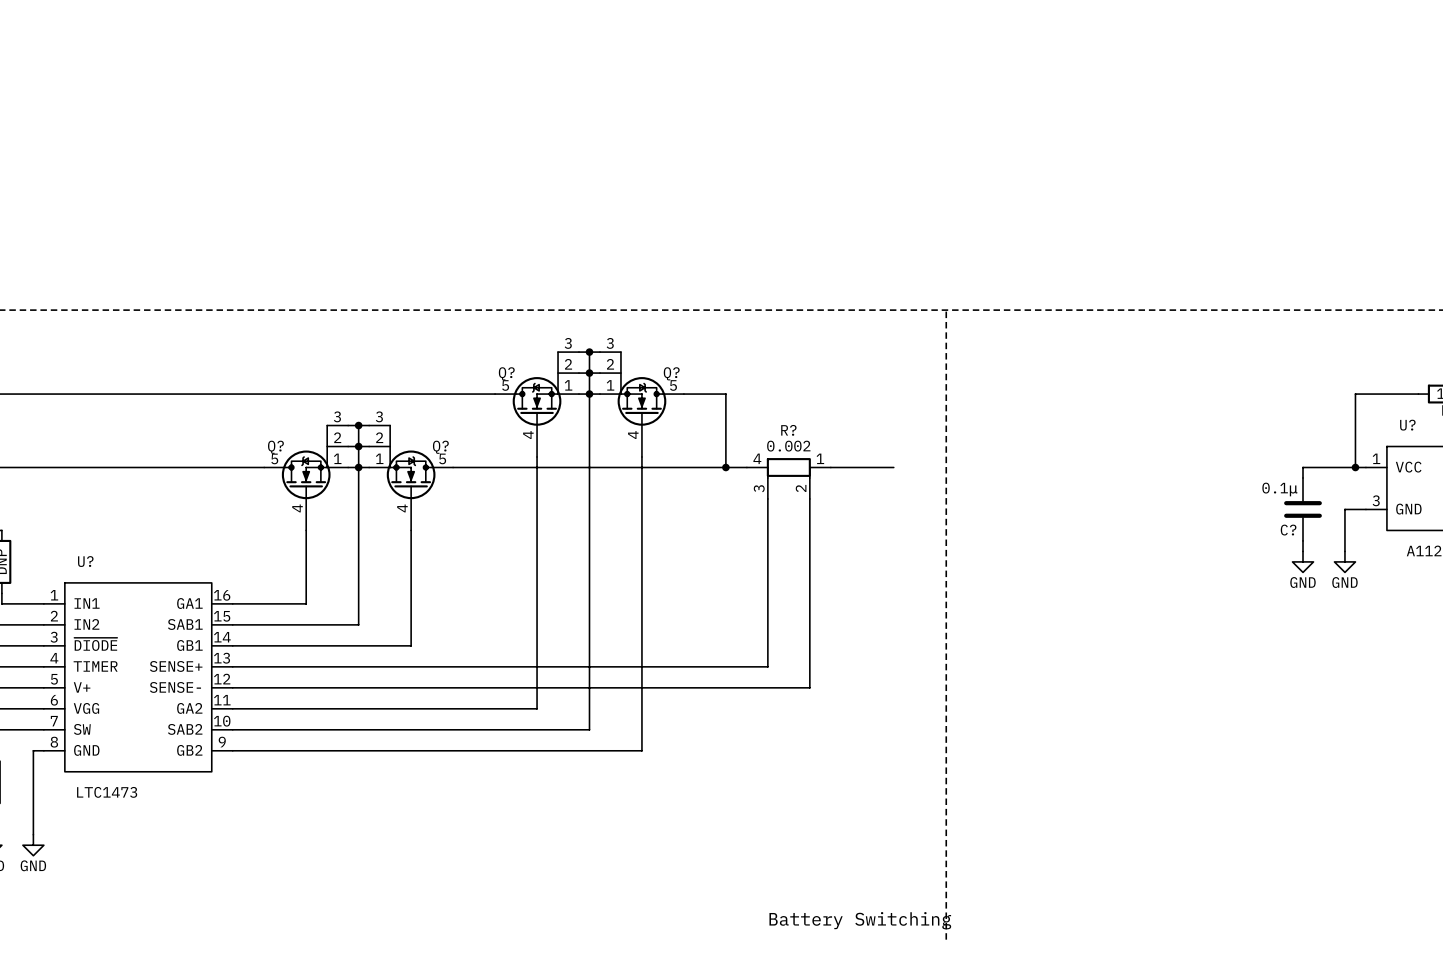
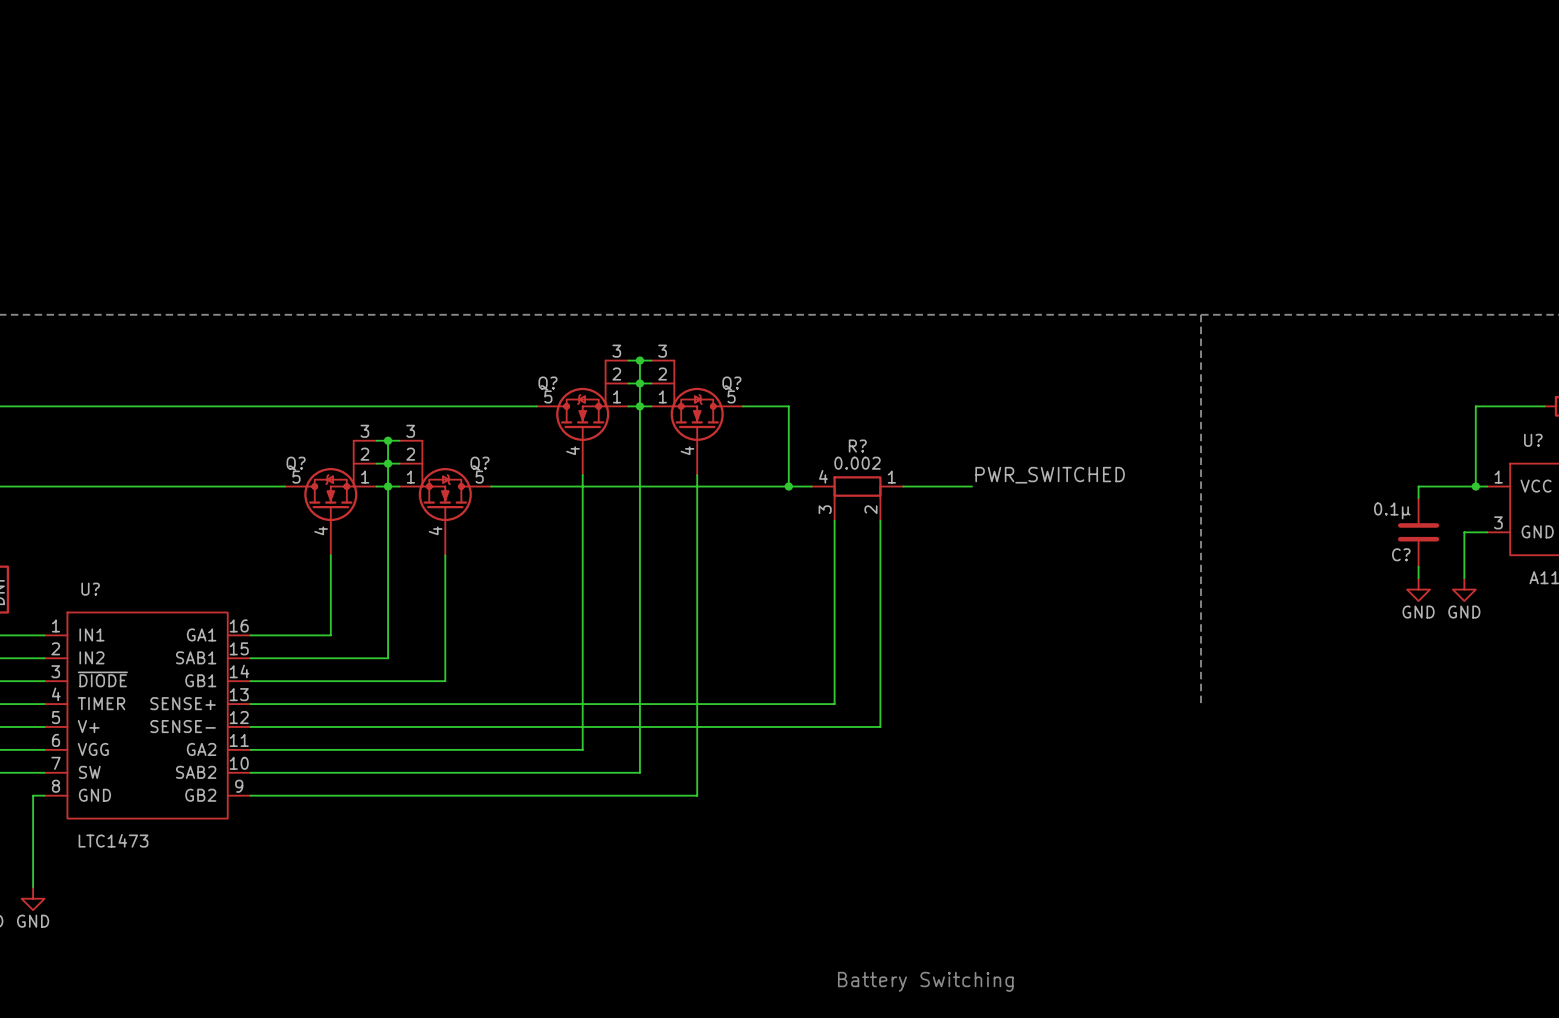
line: (946, 310) (946, 939) -> none
line: none -> (1201, 314) (1201, 704)
label: none -> PWR_SWITCHED (1050, 475)

